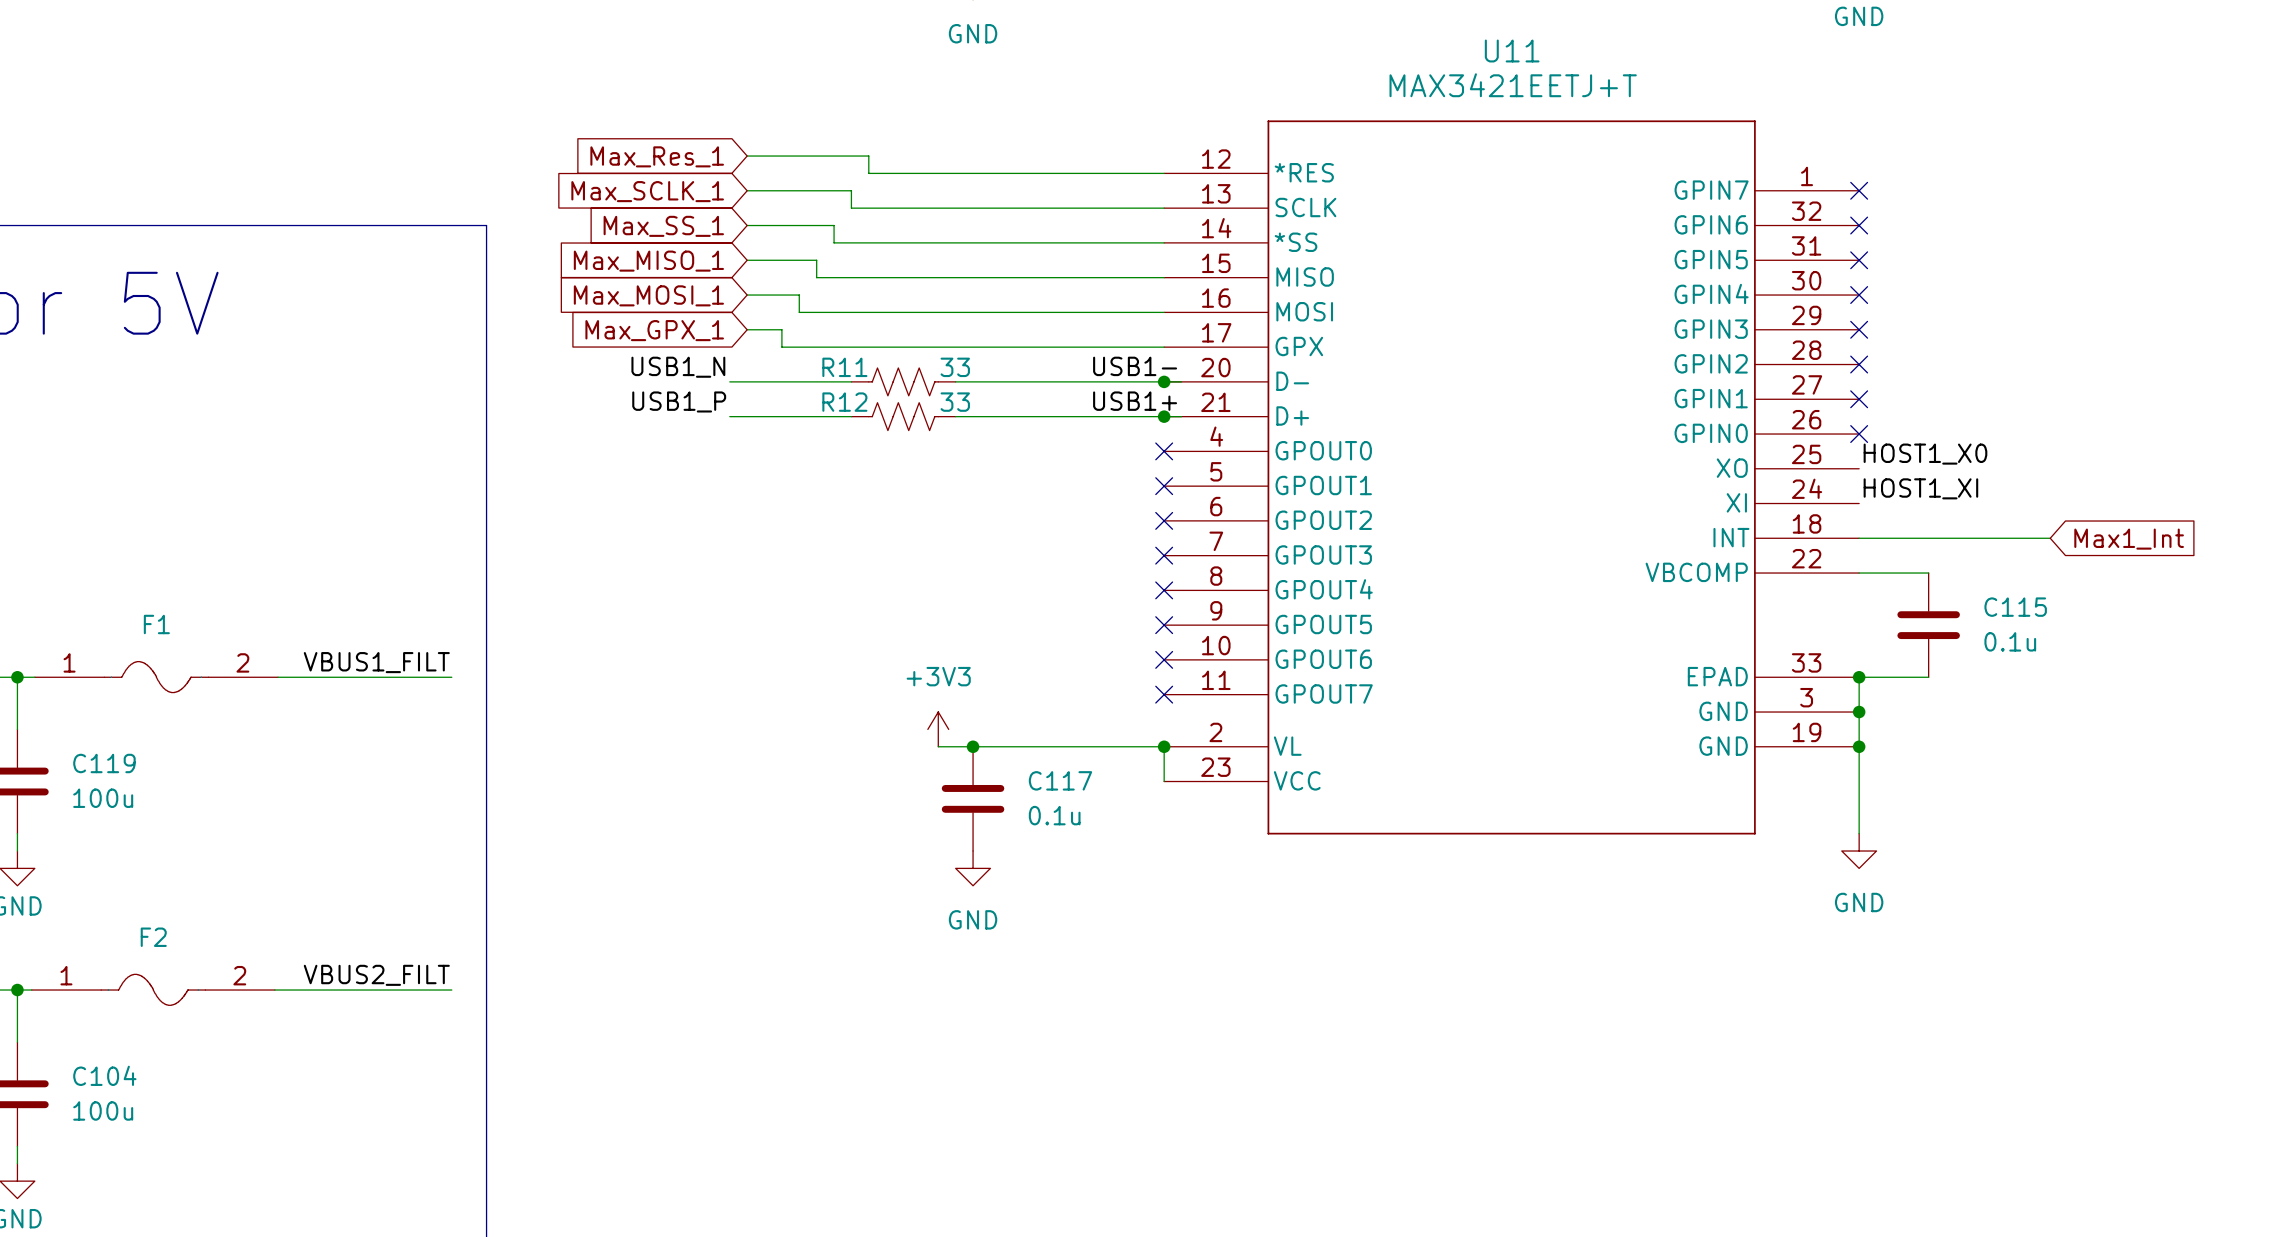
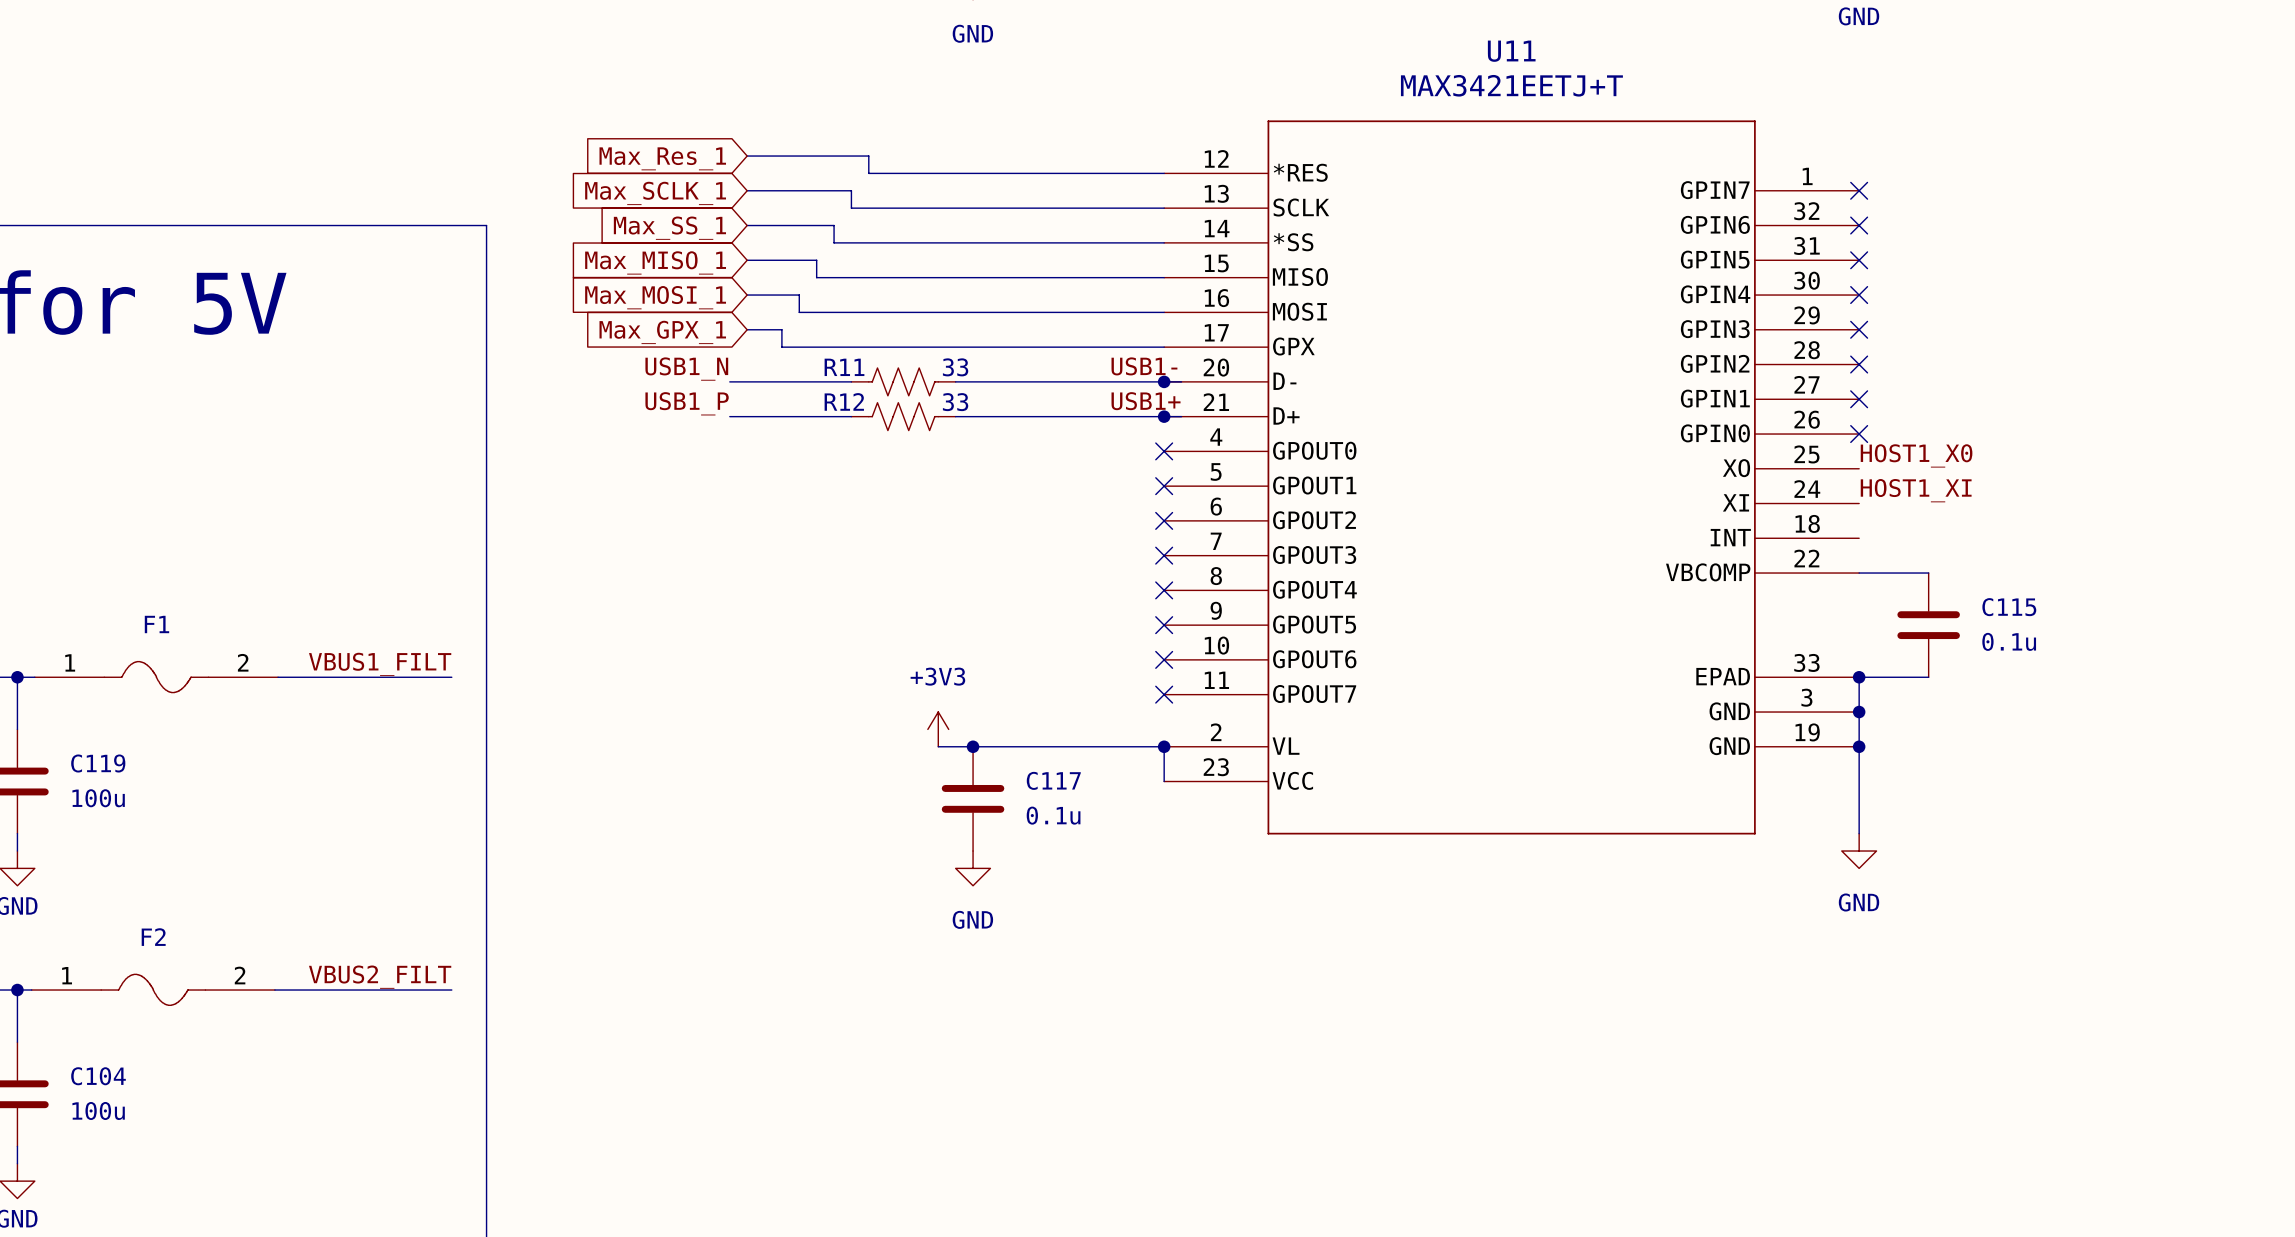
wire: (1859, 538) (2050, 538) -> none
global label: Max1_Int (2129, 539) -> none

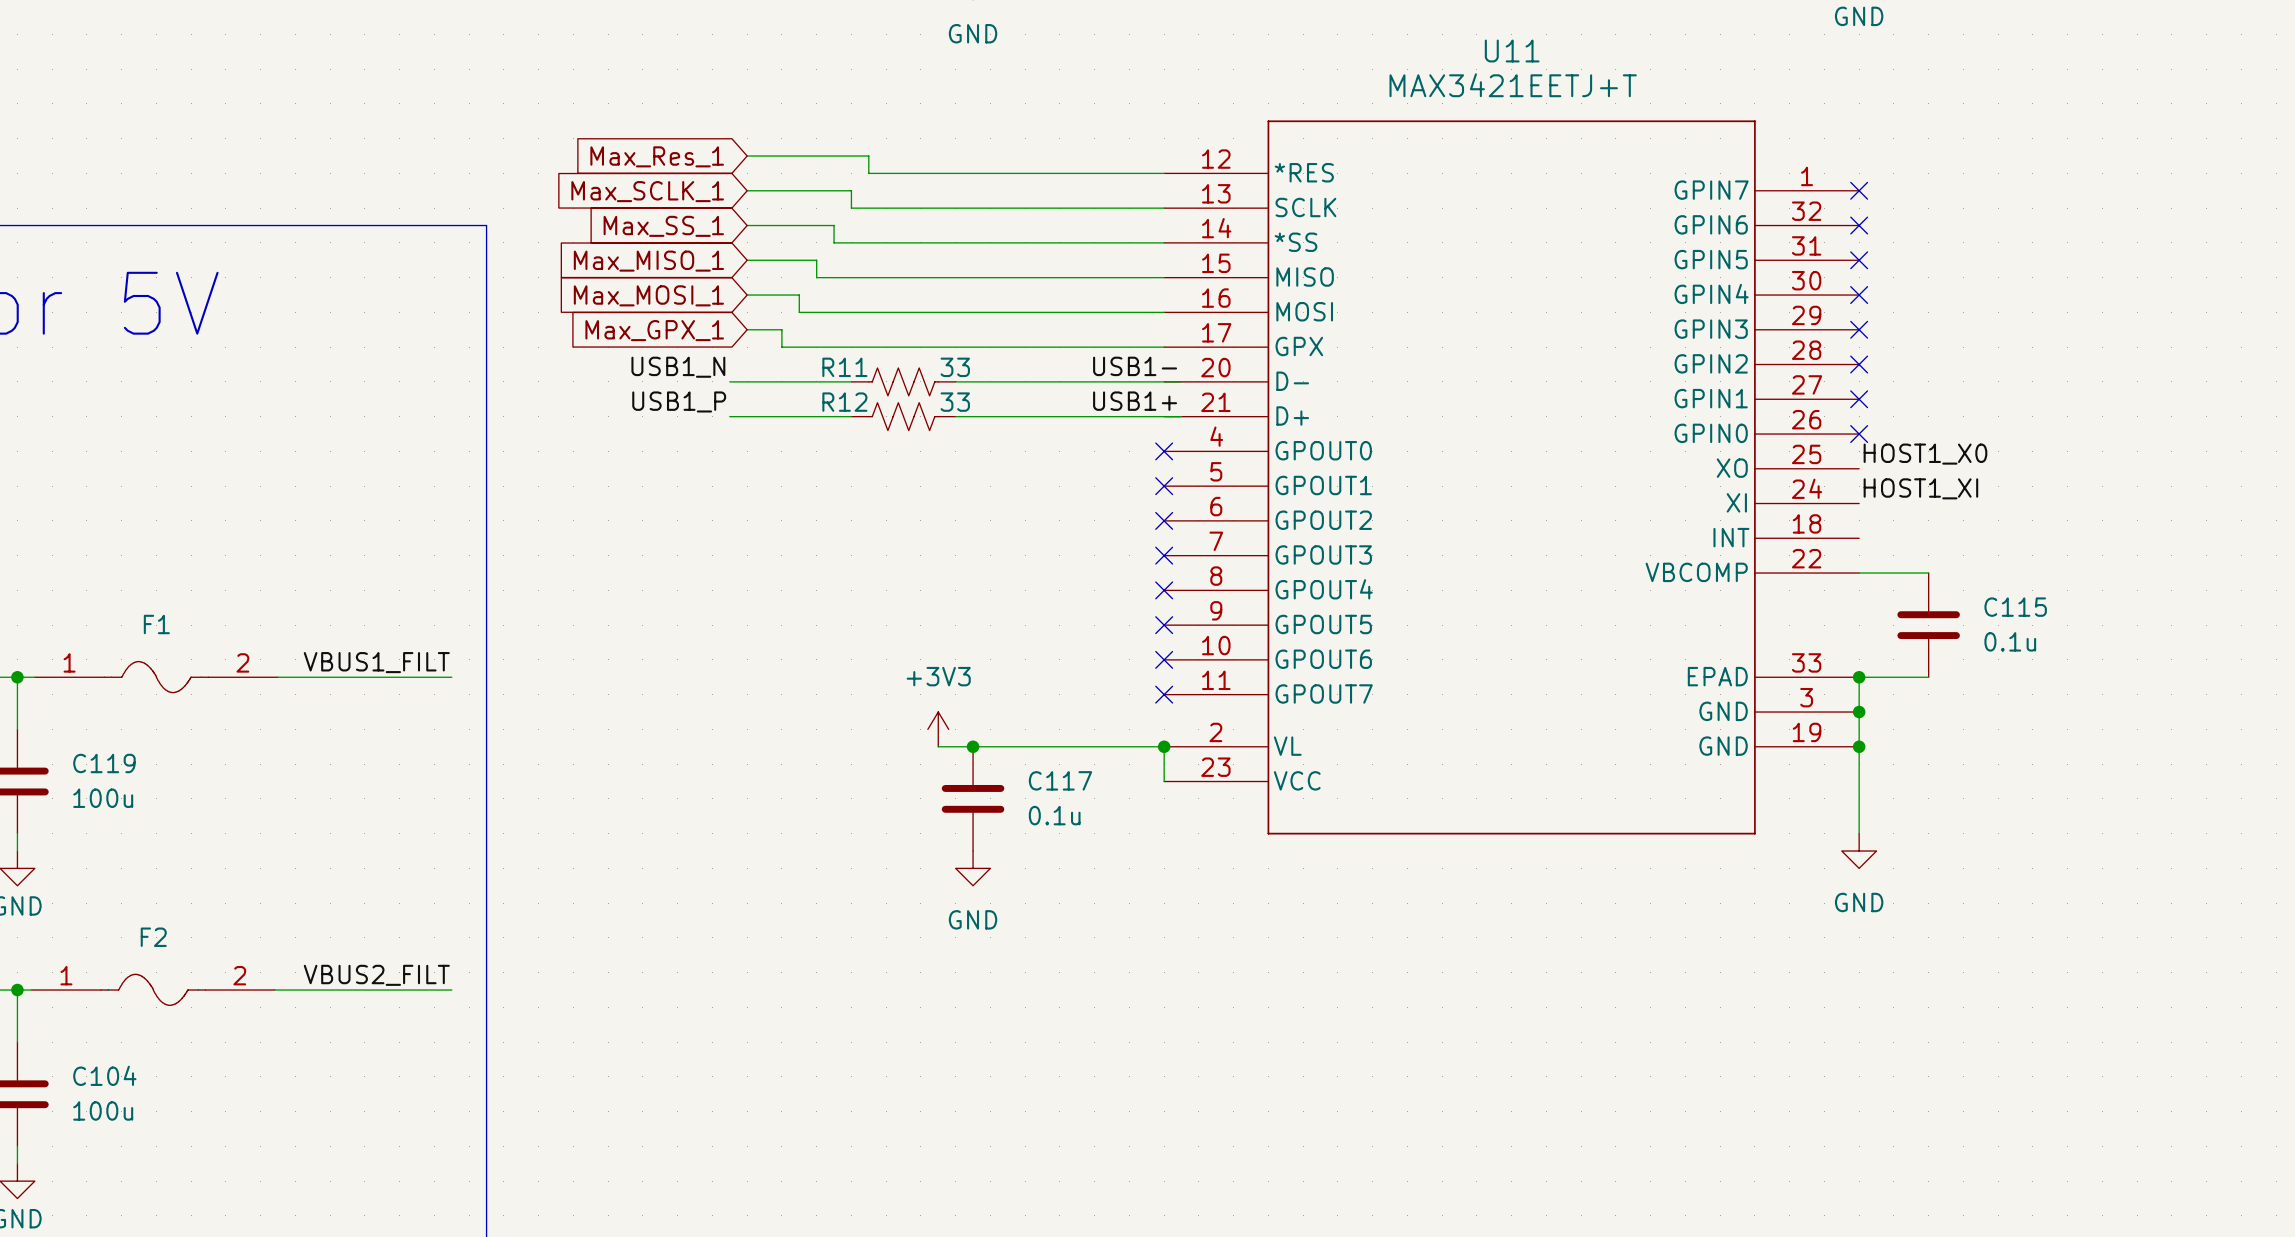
junction: (1164, 381) -> none
junction: (1164, 416) -> none

